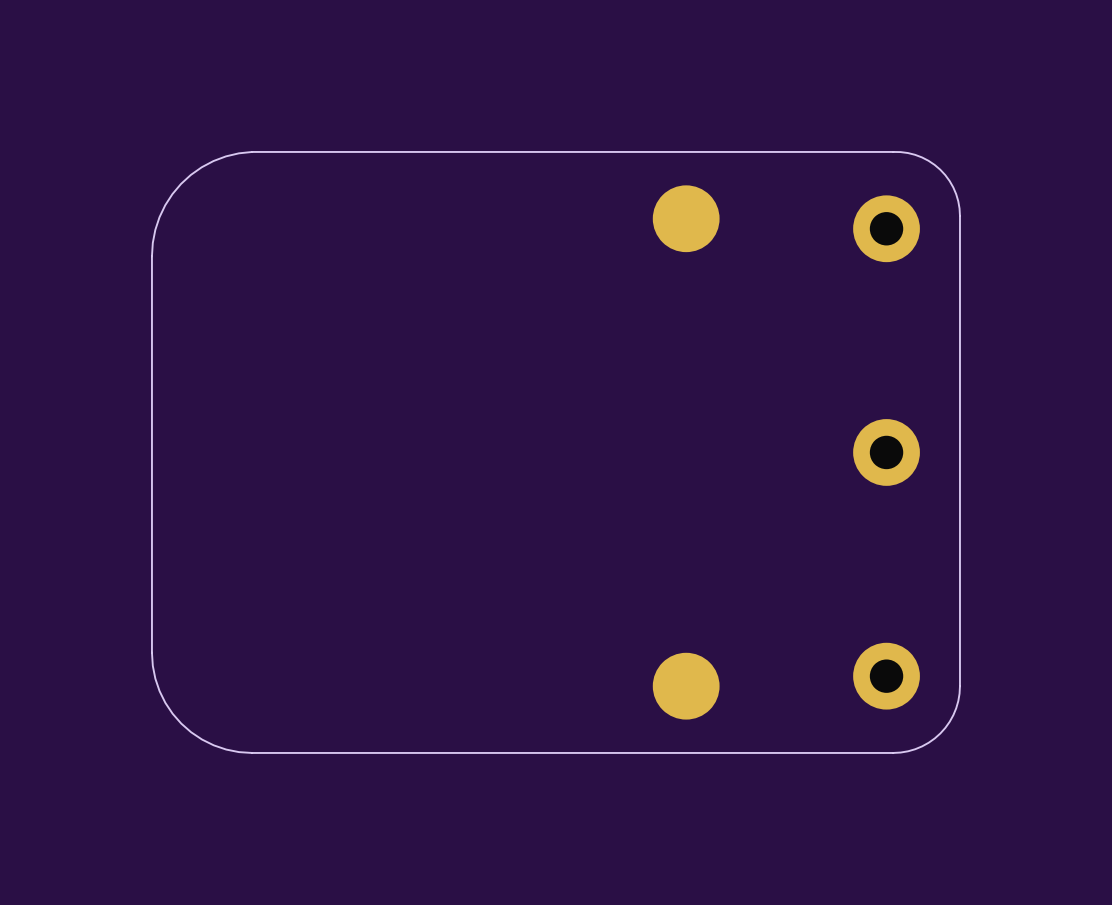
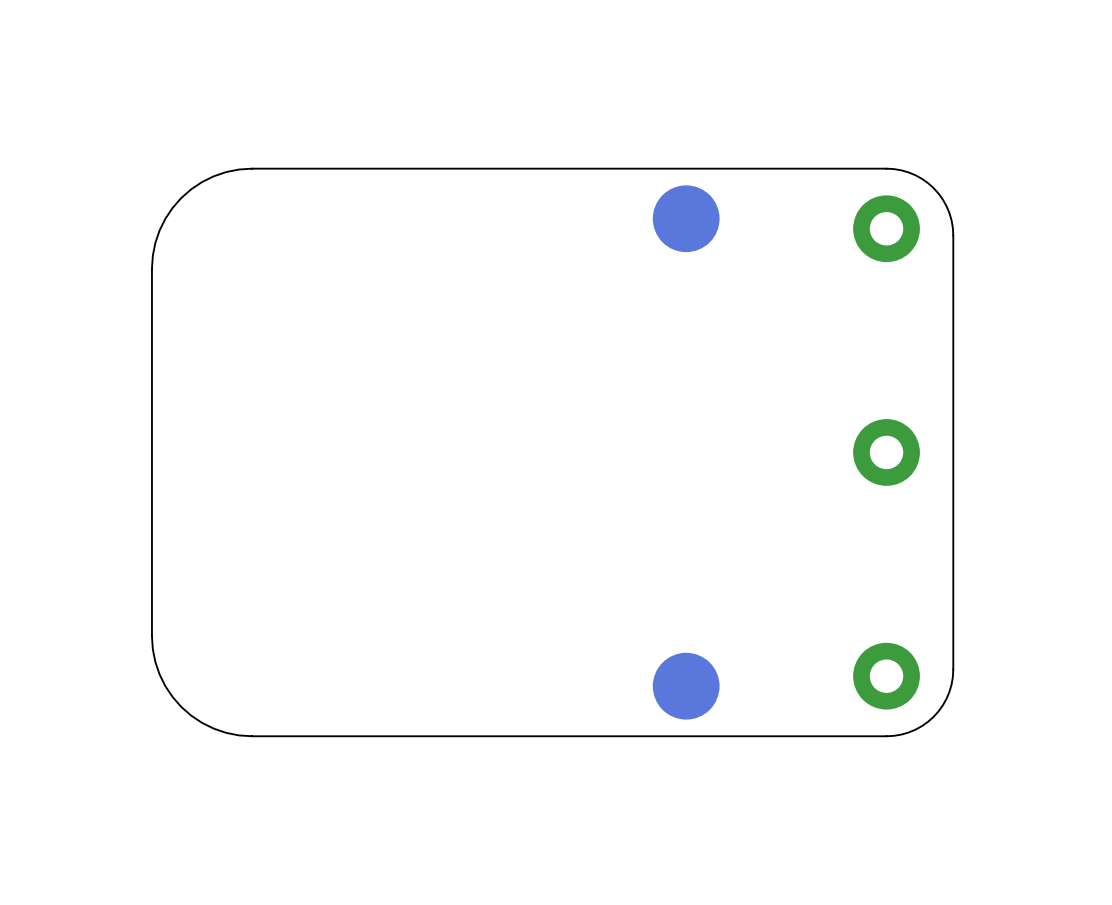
board edge: (151, 268) (152, 242) (159, 217) (165, 205) (181, 183) (190, 174) (213, 161) (225, 156) (252, 151) (900, 152) (921, 157) (940, 169) (953, 187) (959, 208) (959, 693) (953, 715) (945, 727) (934, 738) (922, 746) (908, 751) (893, 752) (239, 752) (213, 745) (202, 739) (191, 732) (172, 713) (165, 702) (155, 678) (152, 665) (151, 636) -> (151, 268) (155, 242) (159, 230) (172, 207) (181, 198) (191, 189) (213, 176) (226, 172) (252, 168) (894, 169) (915, 175) (933, 188) (946, 206) (951, 220) (953, 235) (952, 676) (949, 691) (943, 705) (933, 716) (915, 729) (901, 734) (886, 736) (239, 735) (226, 732) (202, 722) (181, 706) (165, 686) (159, 674) (152, 649) (151, 636)

